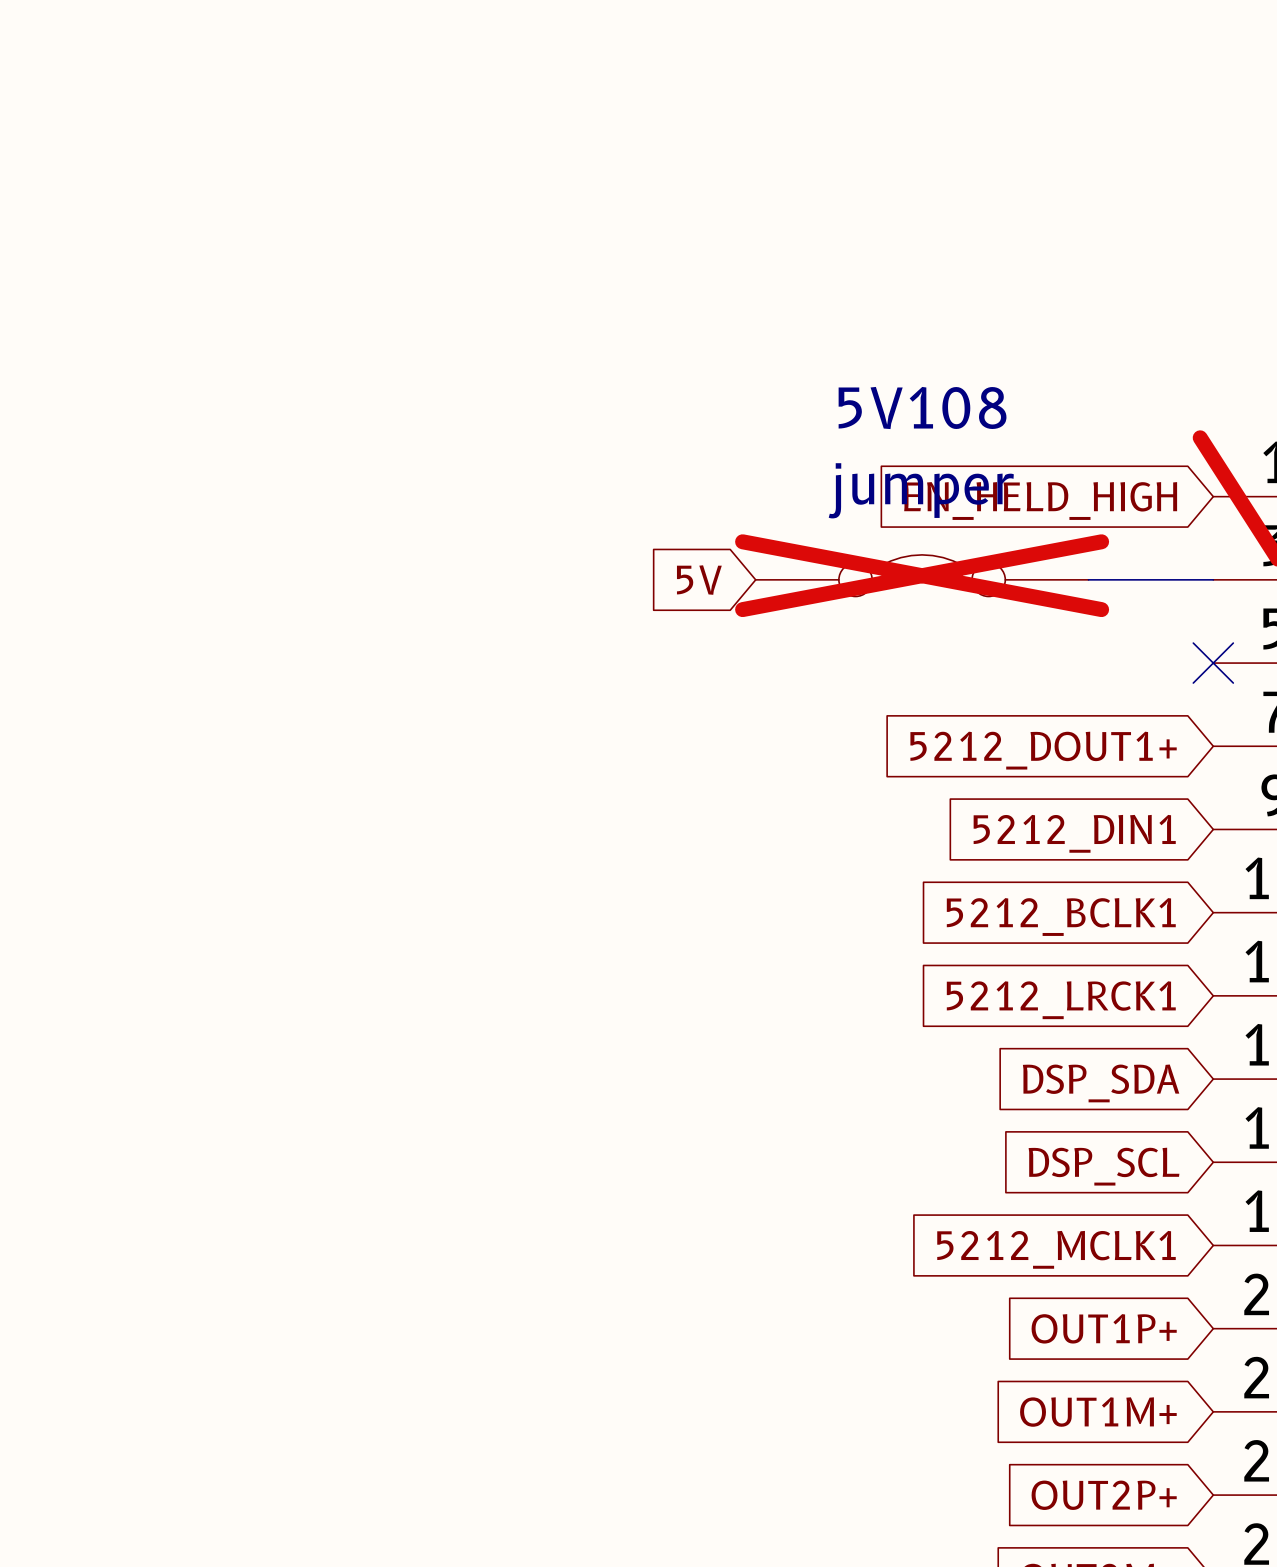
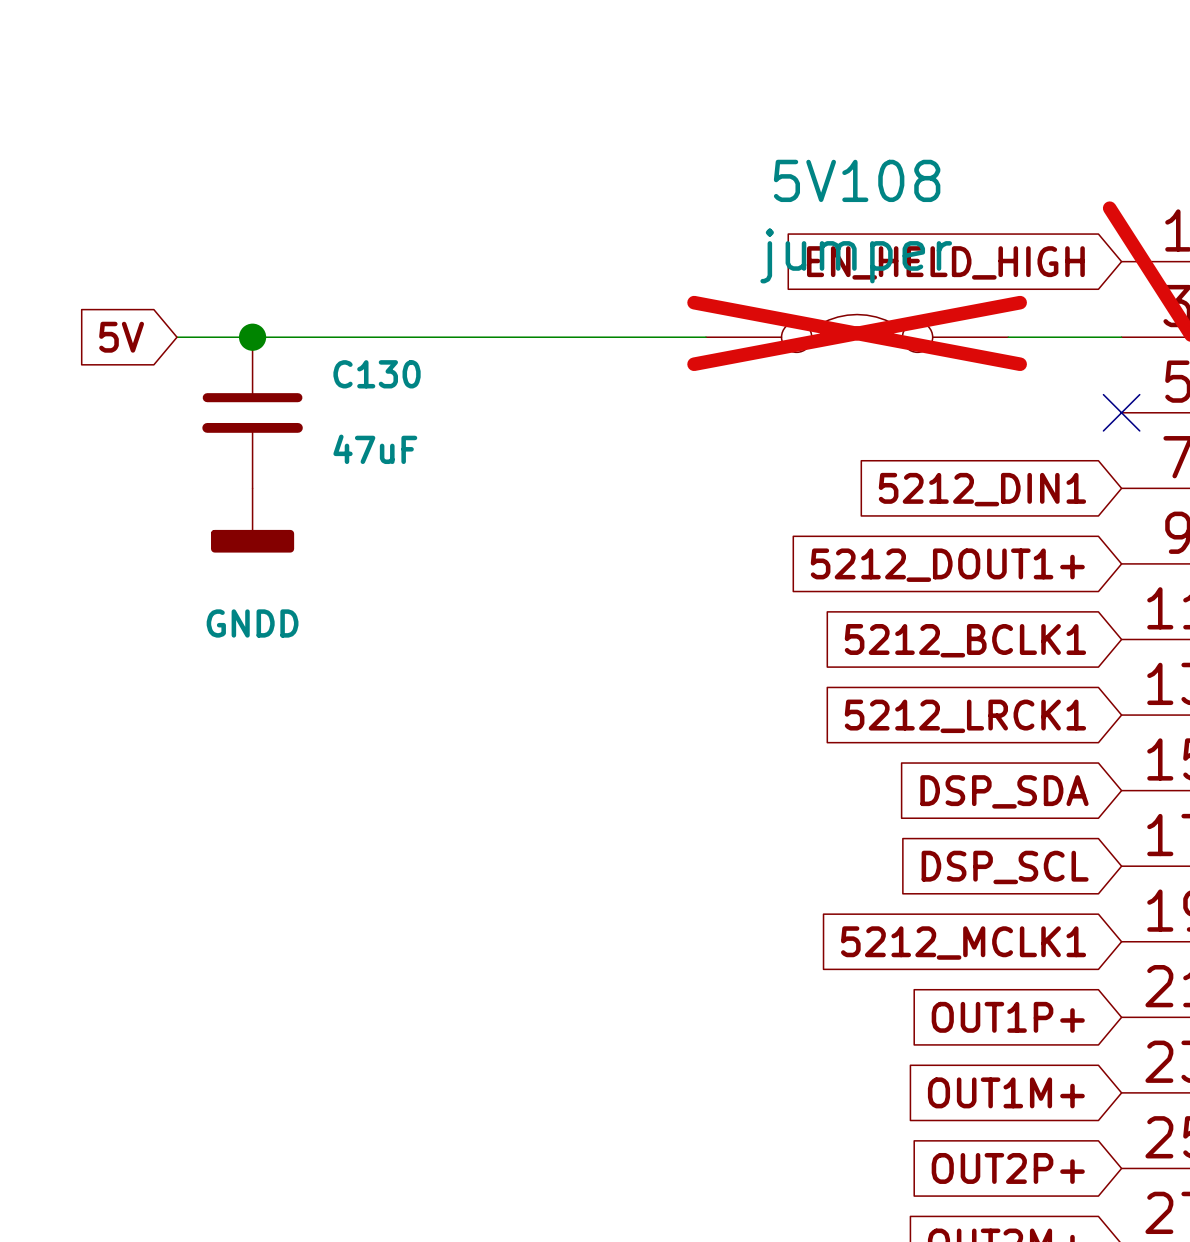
wire: none -> (177, 337) (705, 337)
junction: none -> (252, 337)
global label position: 5V (699, 580) -> 5V (121, 337)
C130: none -> 47uF (252, 412)
global label: 5212_DOUT1+ (1043, 750) -> 5212_DIN1 (982, 489)
power symbol: none -> GNDD (252, 520)
global label: 5212_DIN1 (1074, 833) -> 5212_DOUT1+ (947, 565)

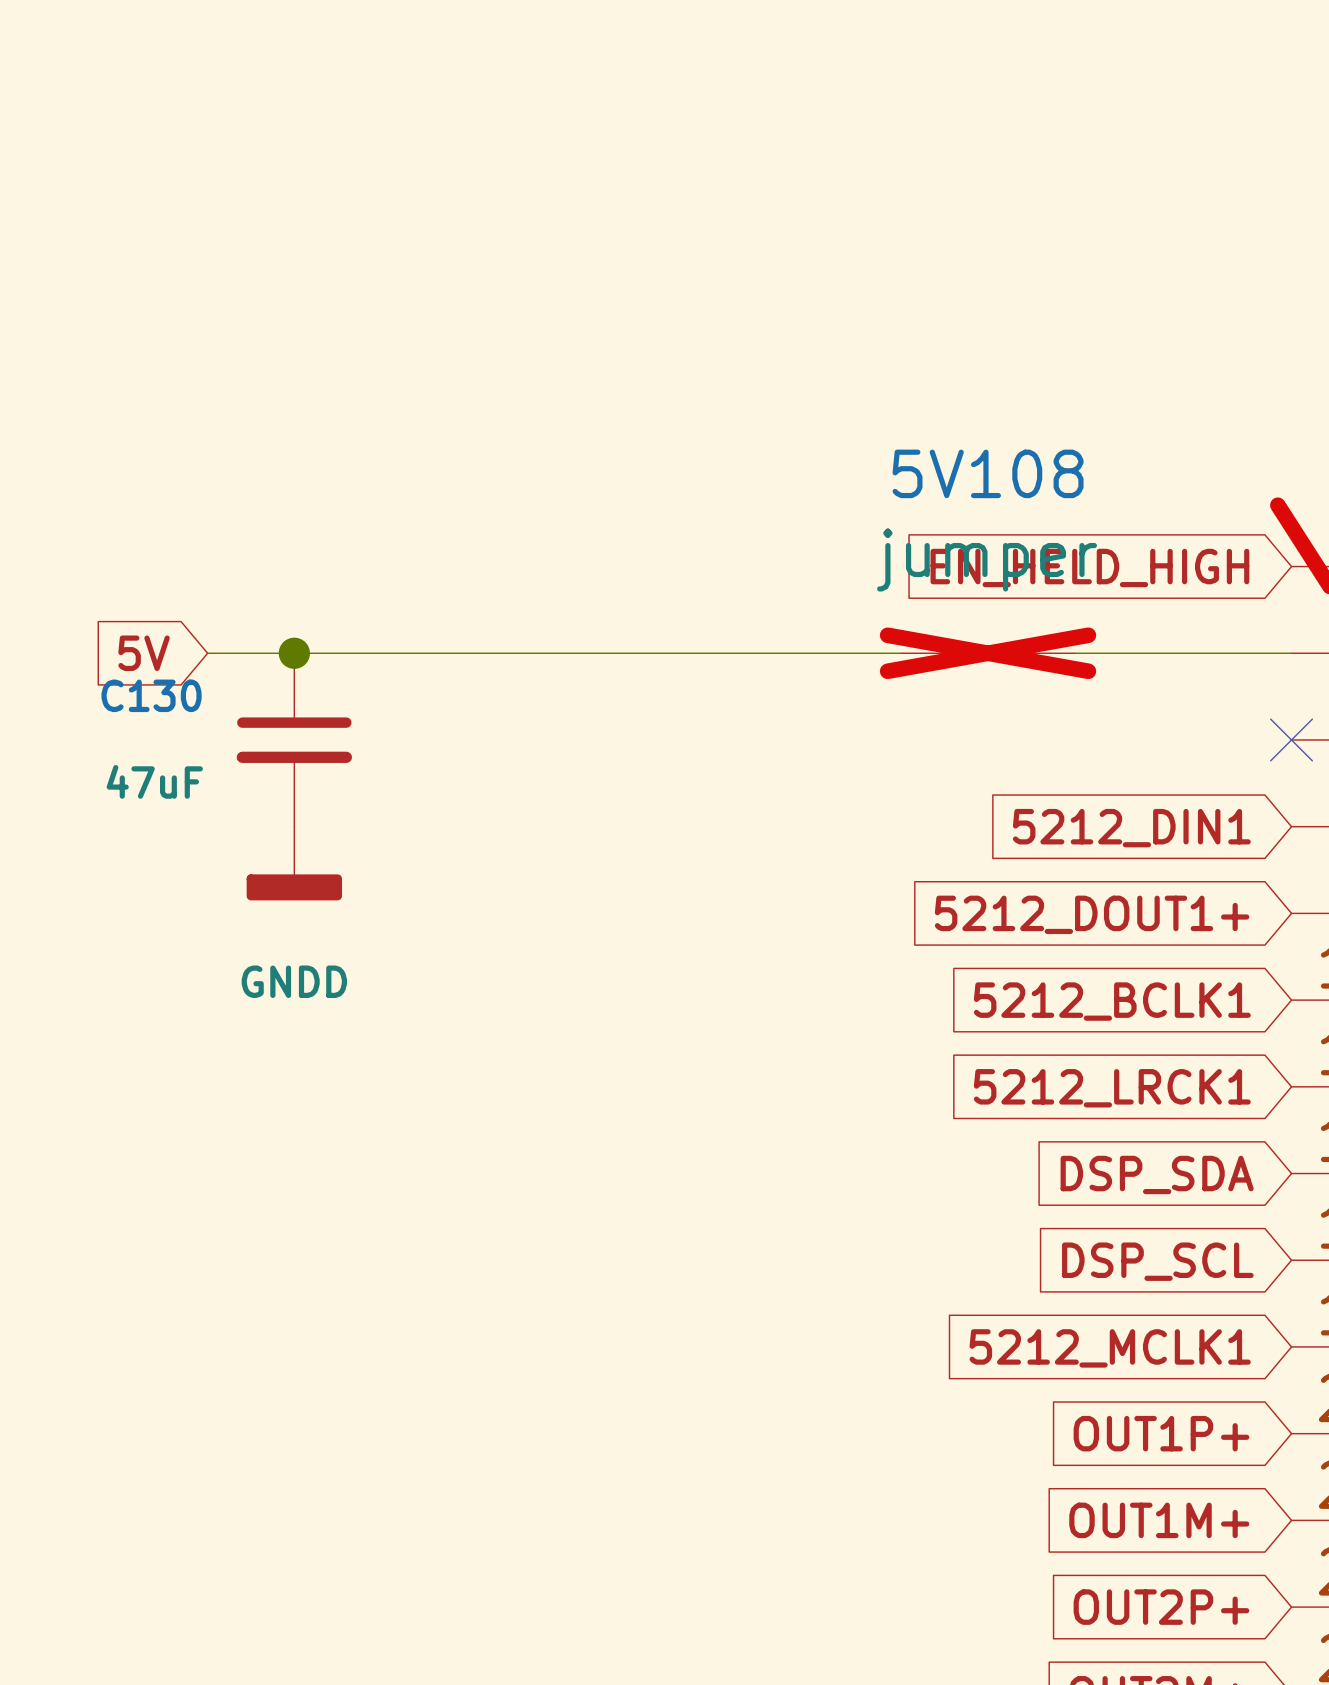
5V108 symbol: [705, 314, 1009, 353] -> [901, 648, 1075, 658]
C130 name position: C130 (377, 374) -> C130 (151, 695)
C130 value position: 47uF (375, 449) -> 47uF (154, 781)

